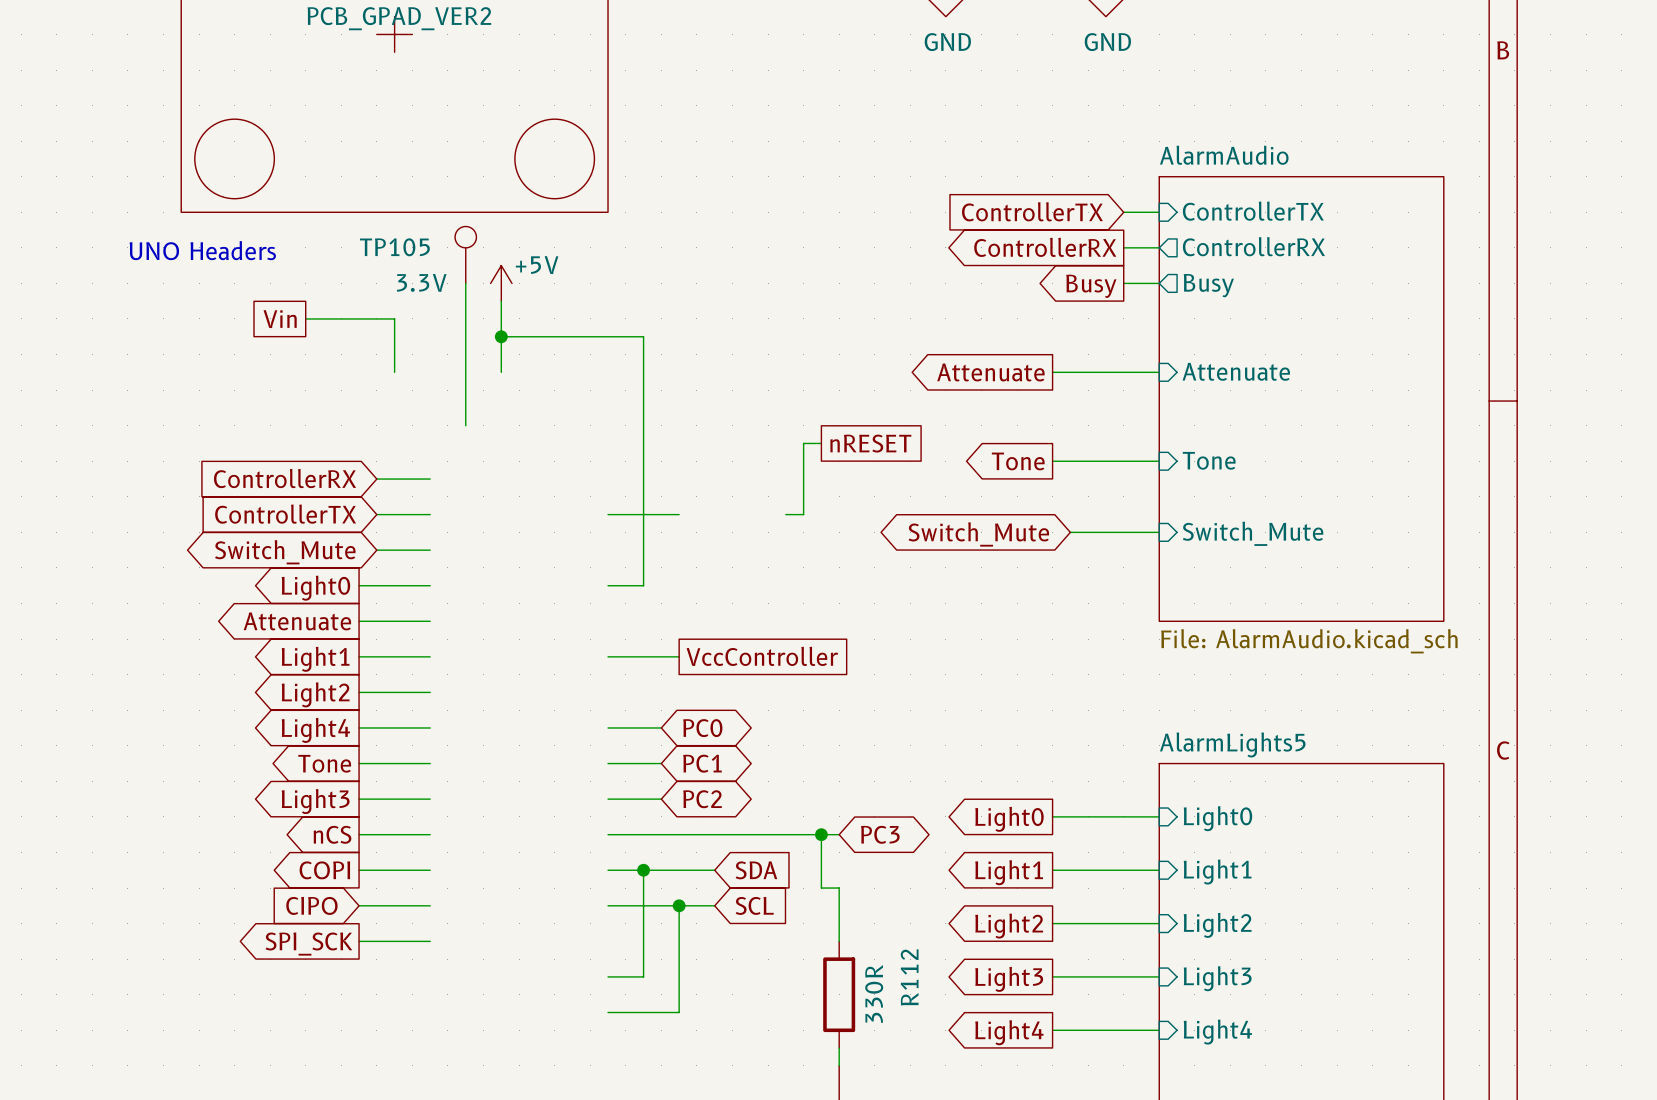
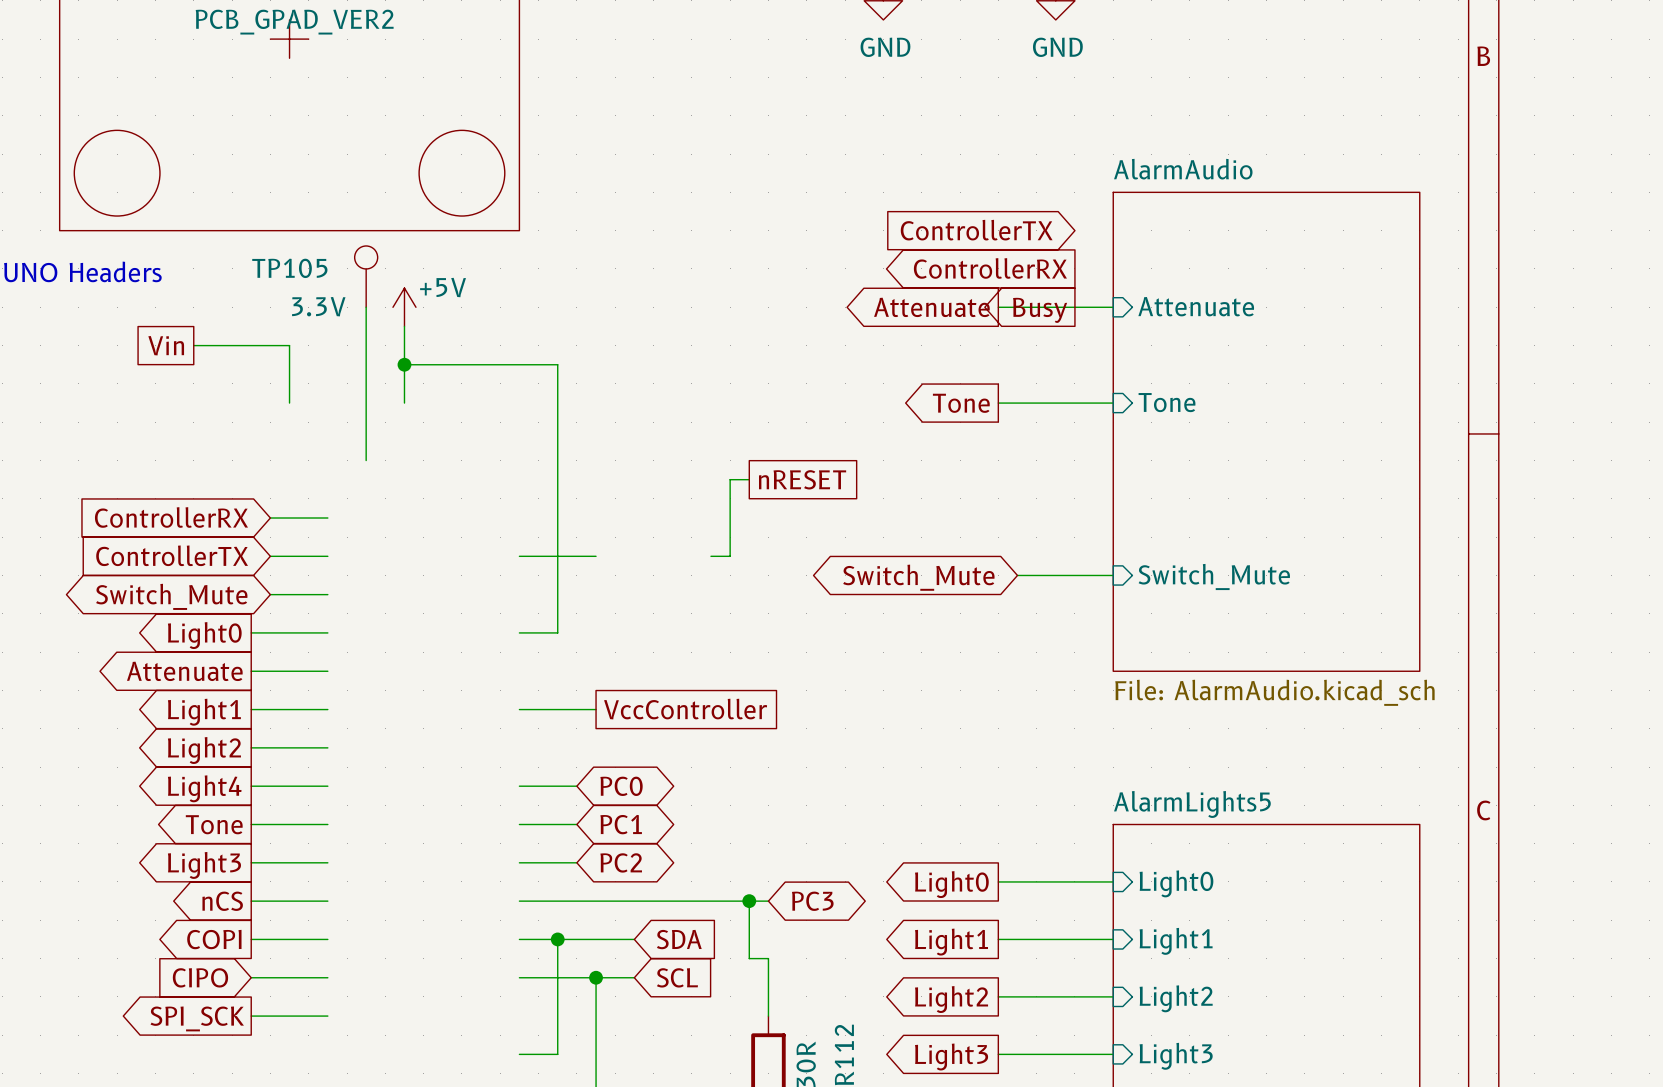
sheet pin: ControllerTX (1253, 211) -> none
wire: (1123, 212) (1159, 212) -> none
sheet pin: ControllerRX (1253, 246) -> none
wire: (1123, 247) (1159, 247) -> none
global label: none -> Attenuate (931, 307)
wire: none -> (998, 307) (1074, 307)
sheet pin shape: output (1208, 285) -> input (1196, 306)
sheet pin: Busy (1208, 285) -> Attenuate (1196, 306)
sheet pin: Attenuate (1236, 371) -> Tone (1167, 402)
global label: Attenuate (990, 372) -> Tone (961, 403)
sheet pin: Tone (1209, 460) -> none
global label: Tone (1018, 461) -> none
wire: (1052, 461) (1159, 461) -> none

